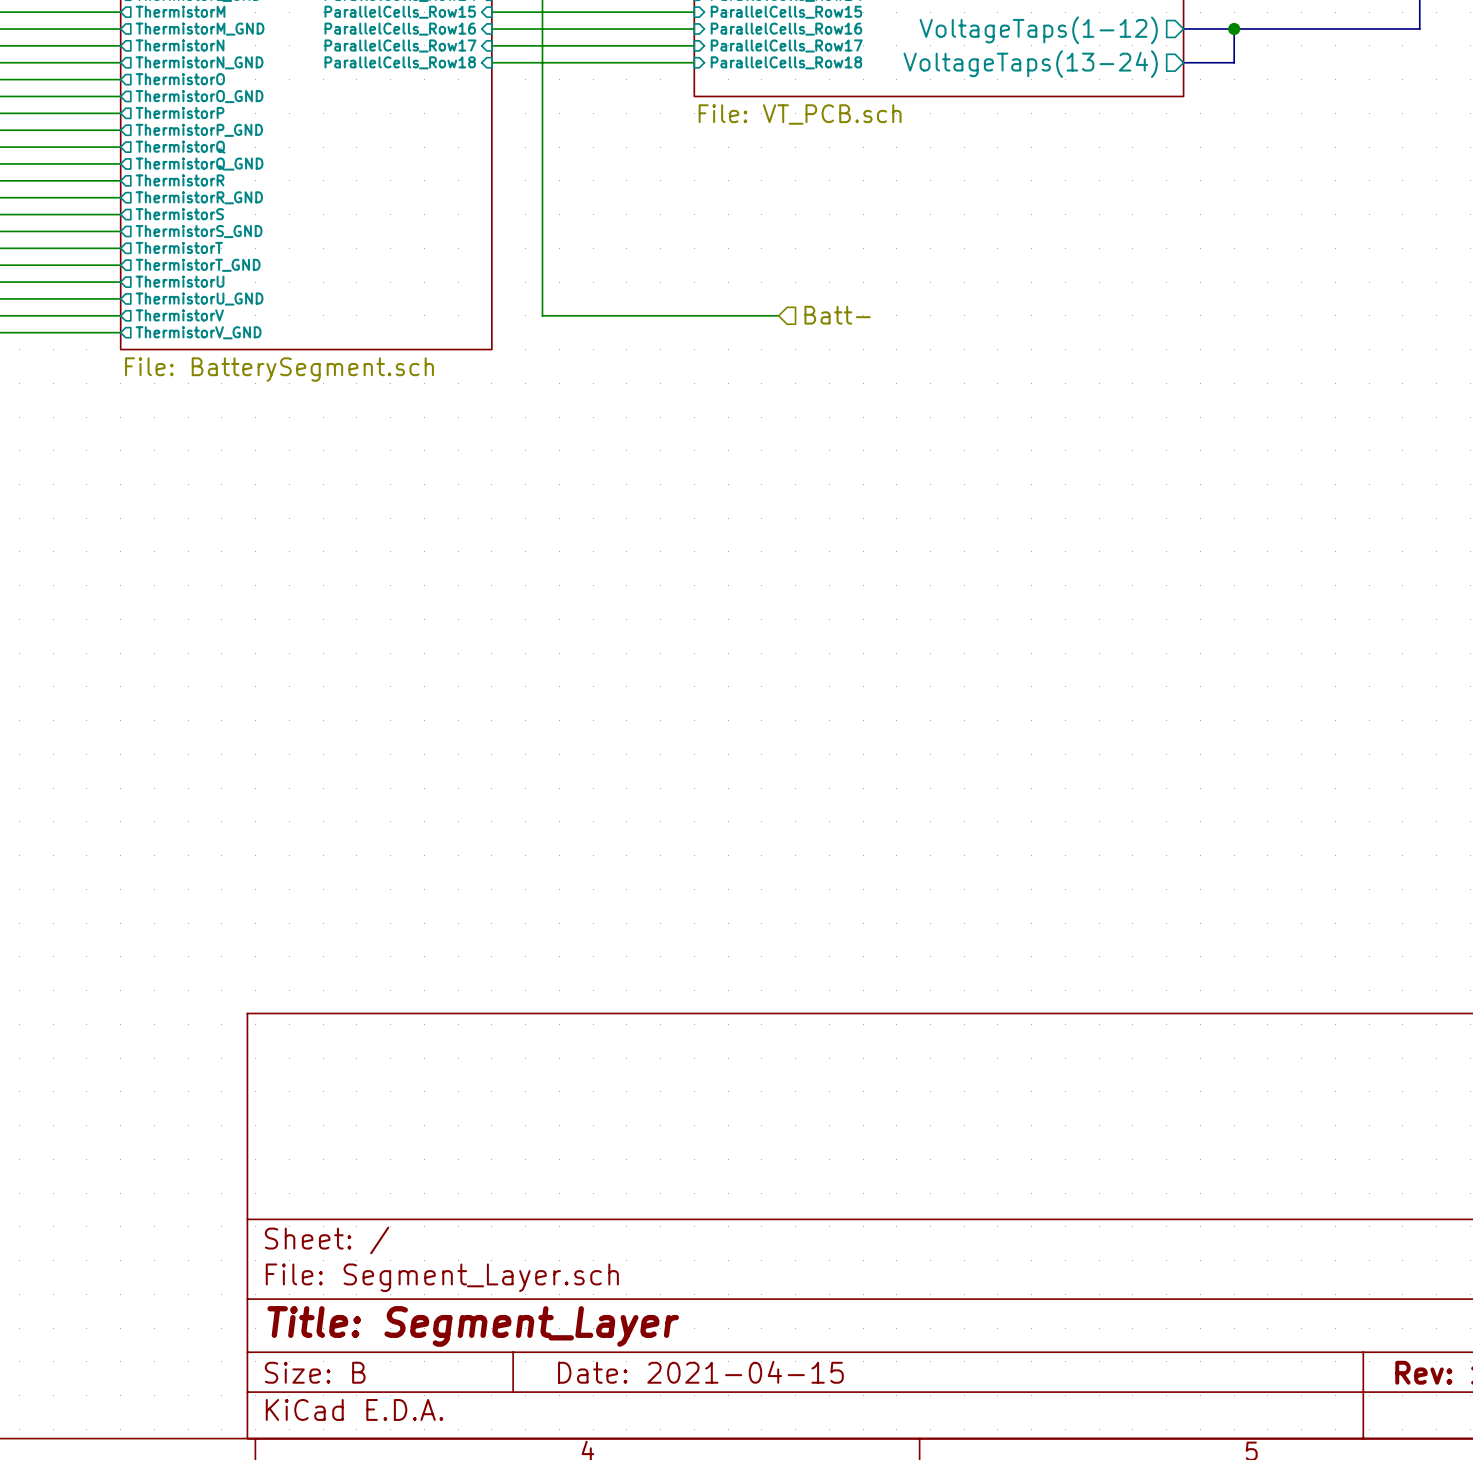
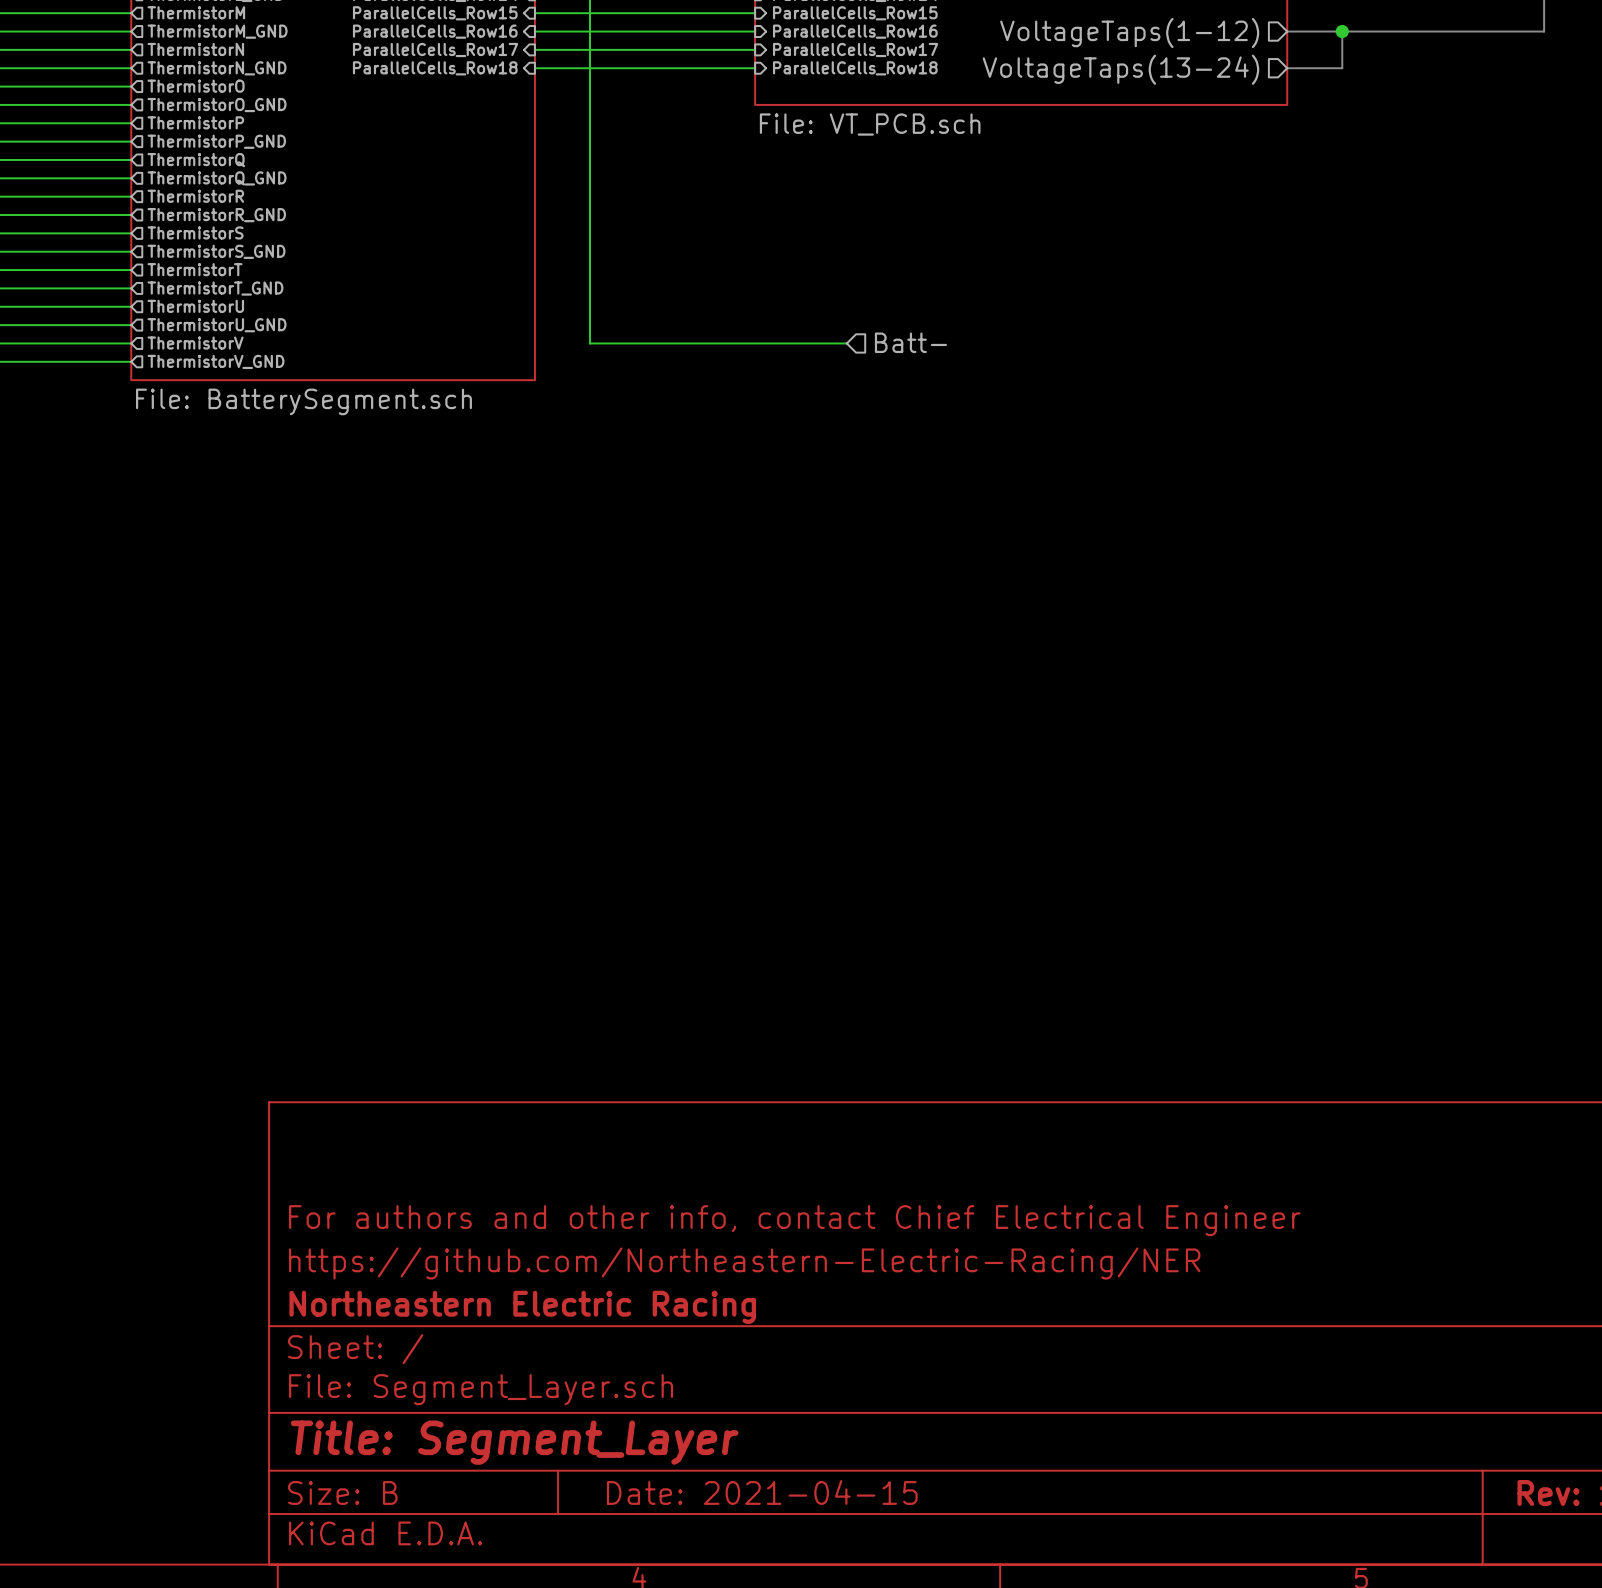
title block: none -> For authors and other info, contact Chief Electrical Engineer (794, 1220)
title block: none -> https://github.com/Northeastern-Electric-Racing/NER (744, 1263)
title block: none -> Northeastern Electric Racing (522, 1307)

